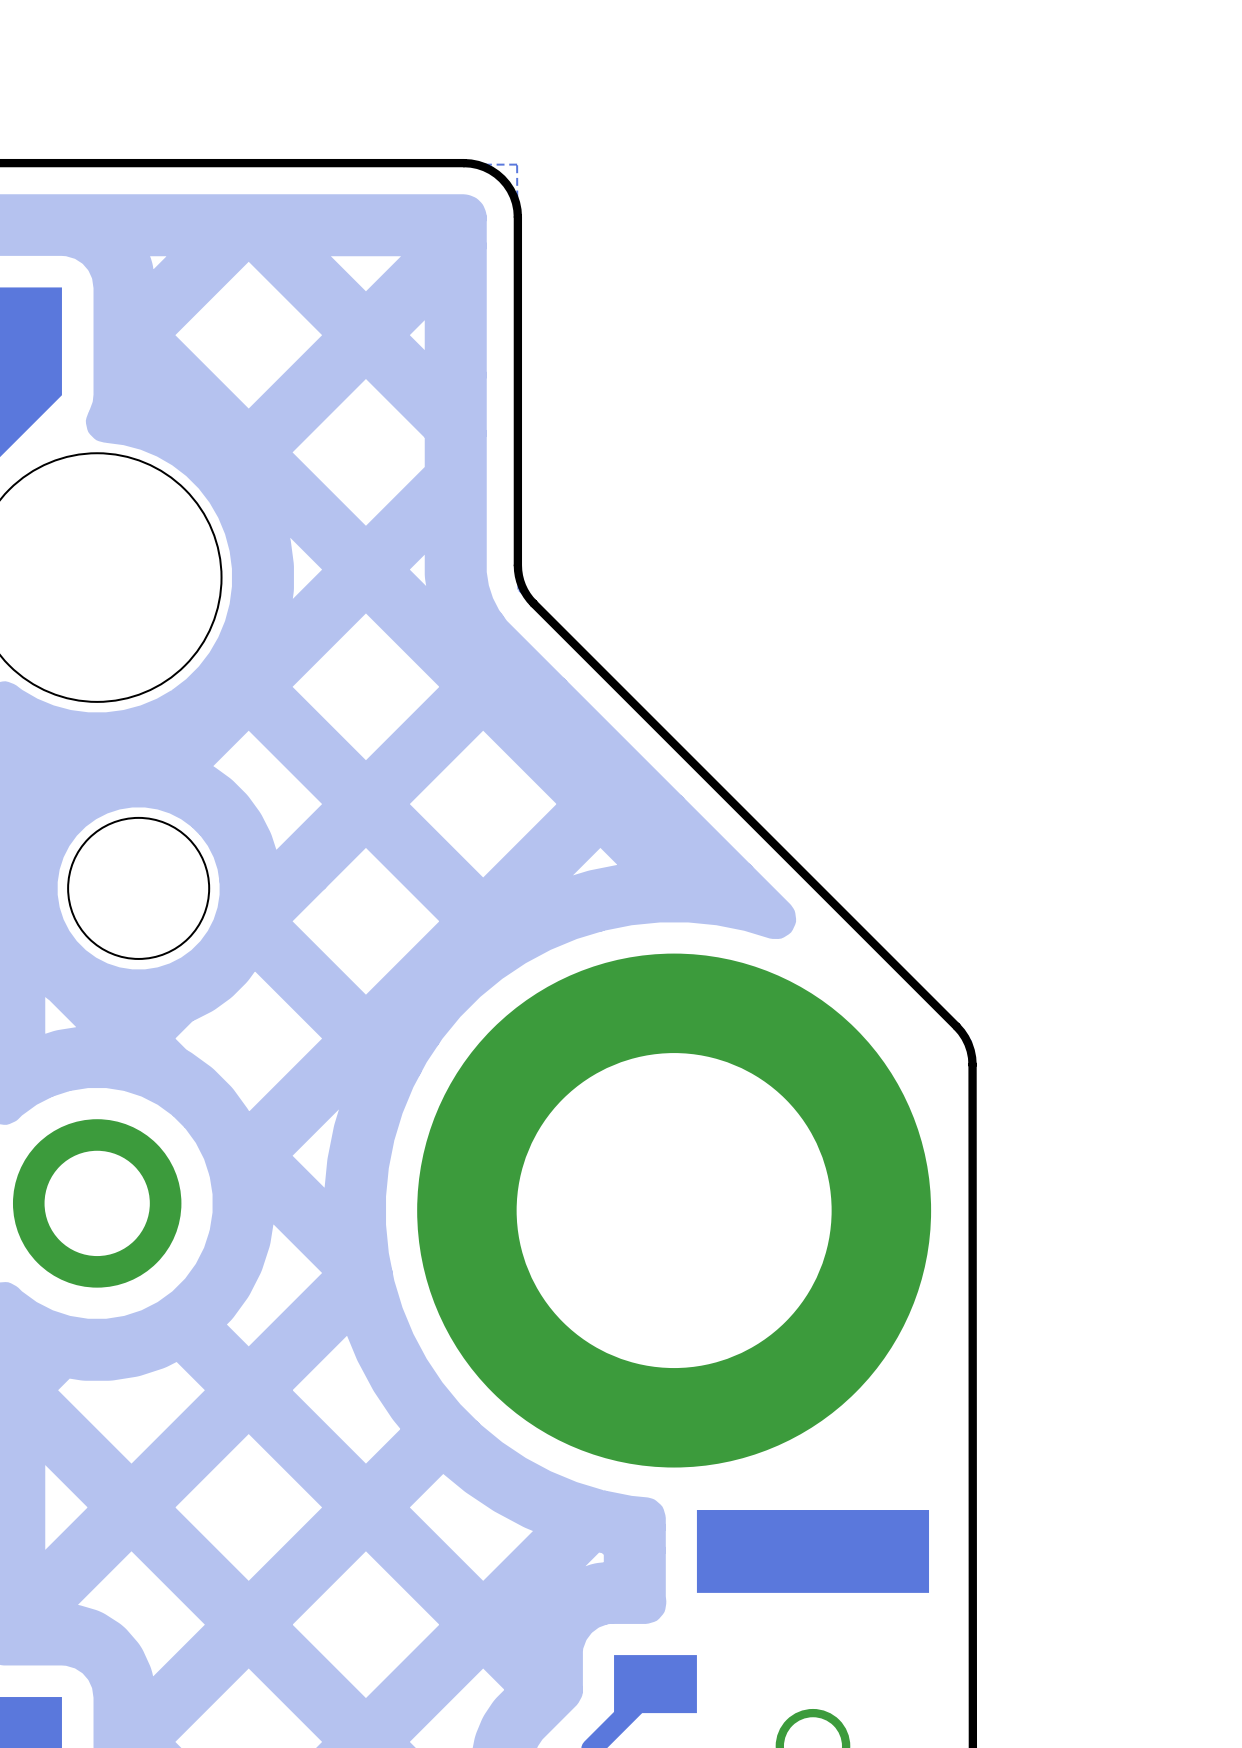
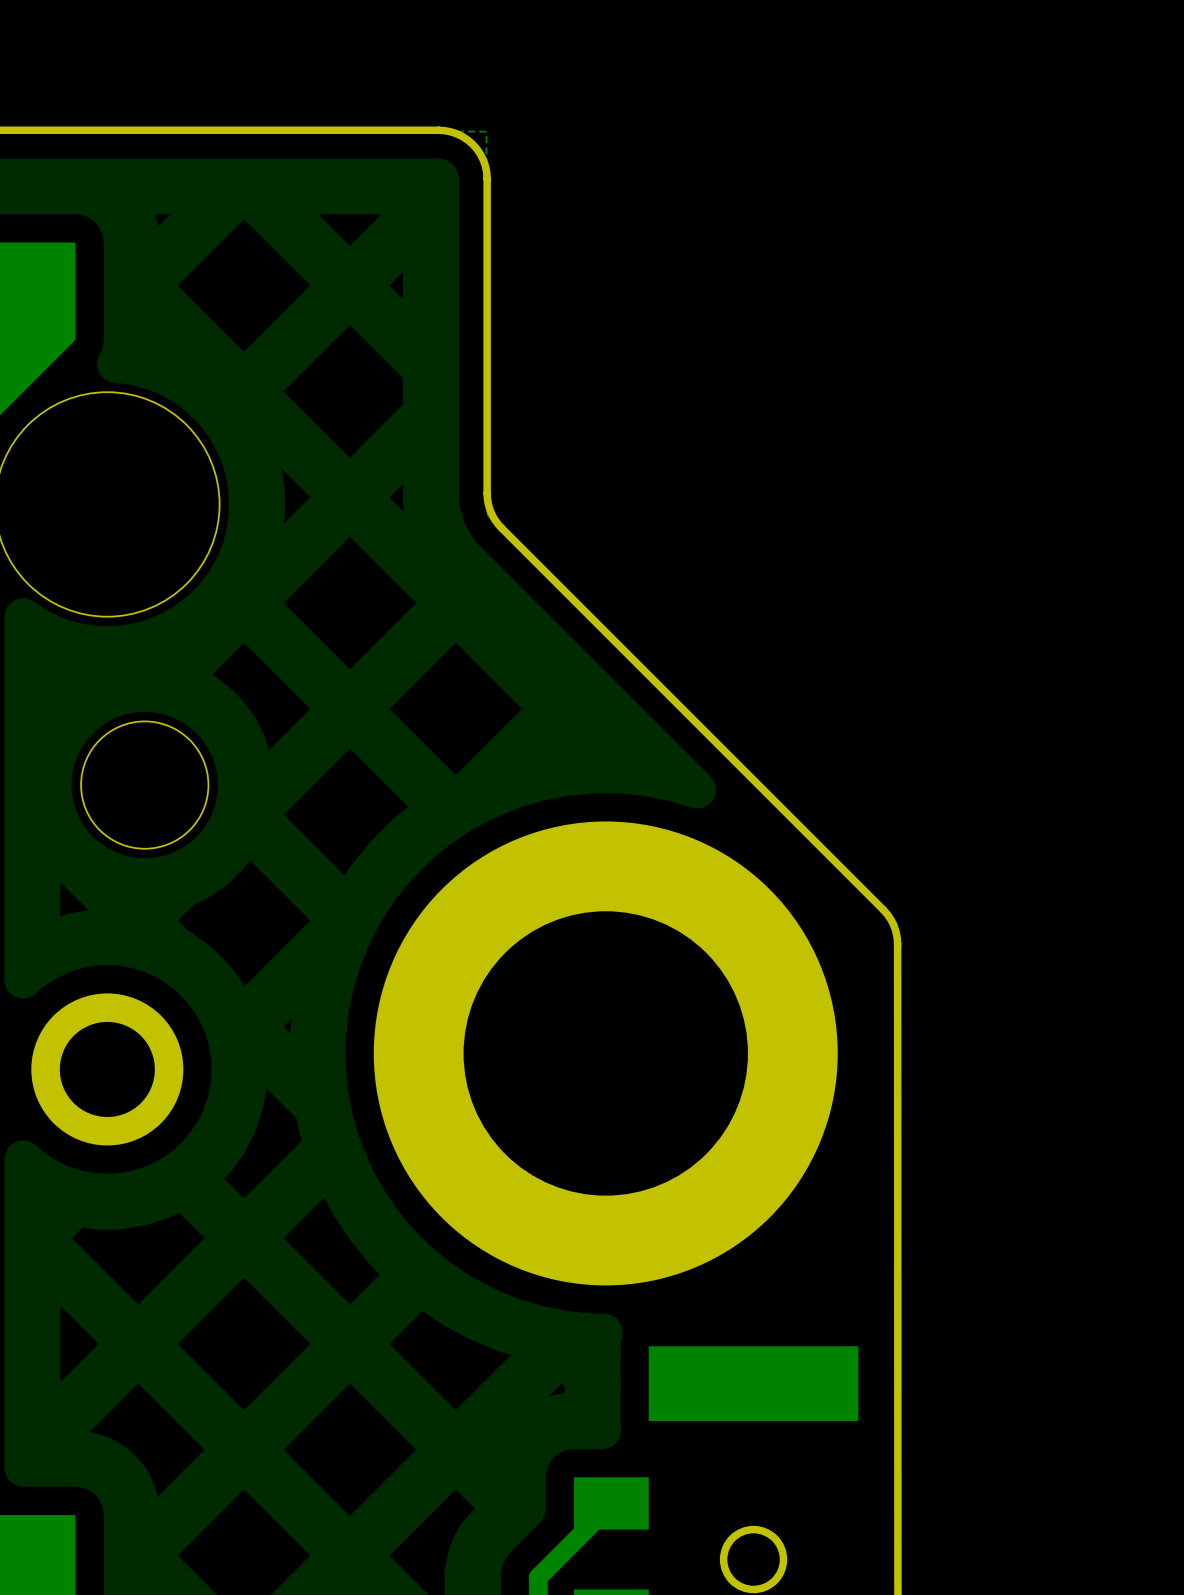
part position: (674, 1210) -> (605, 1053)

